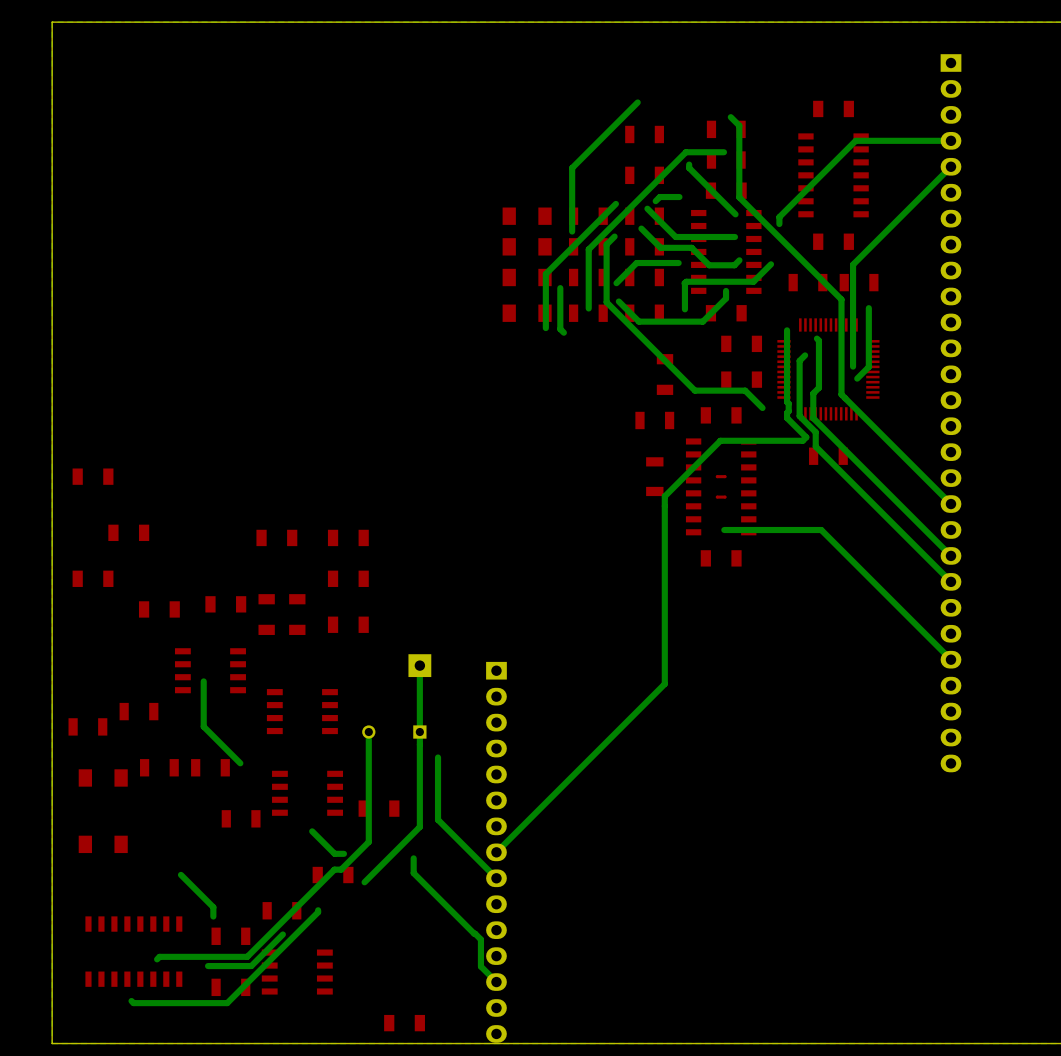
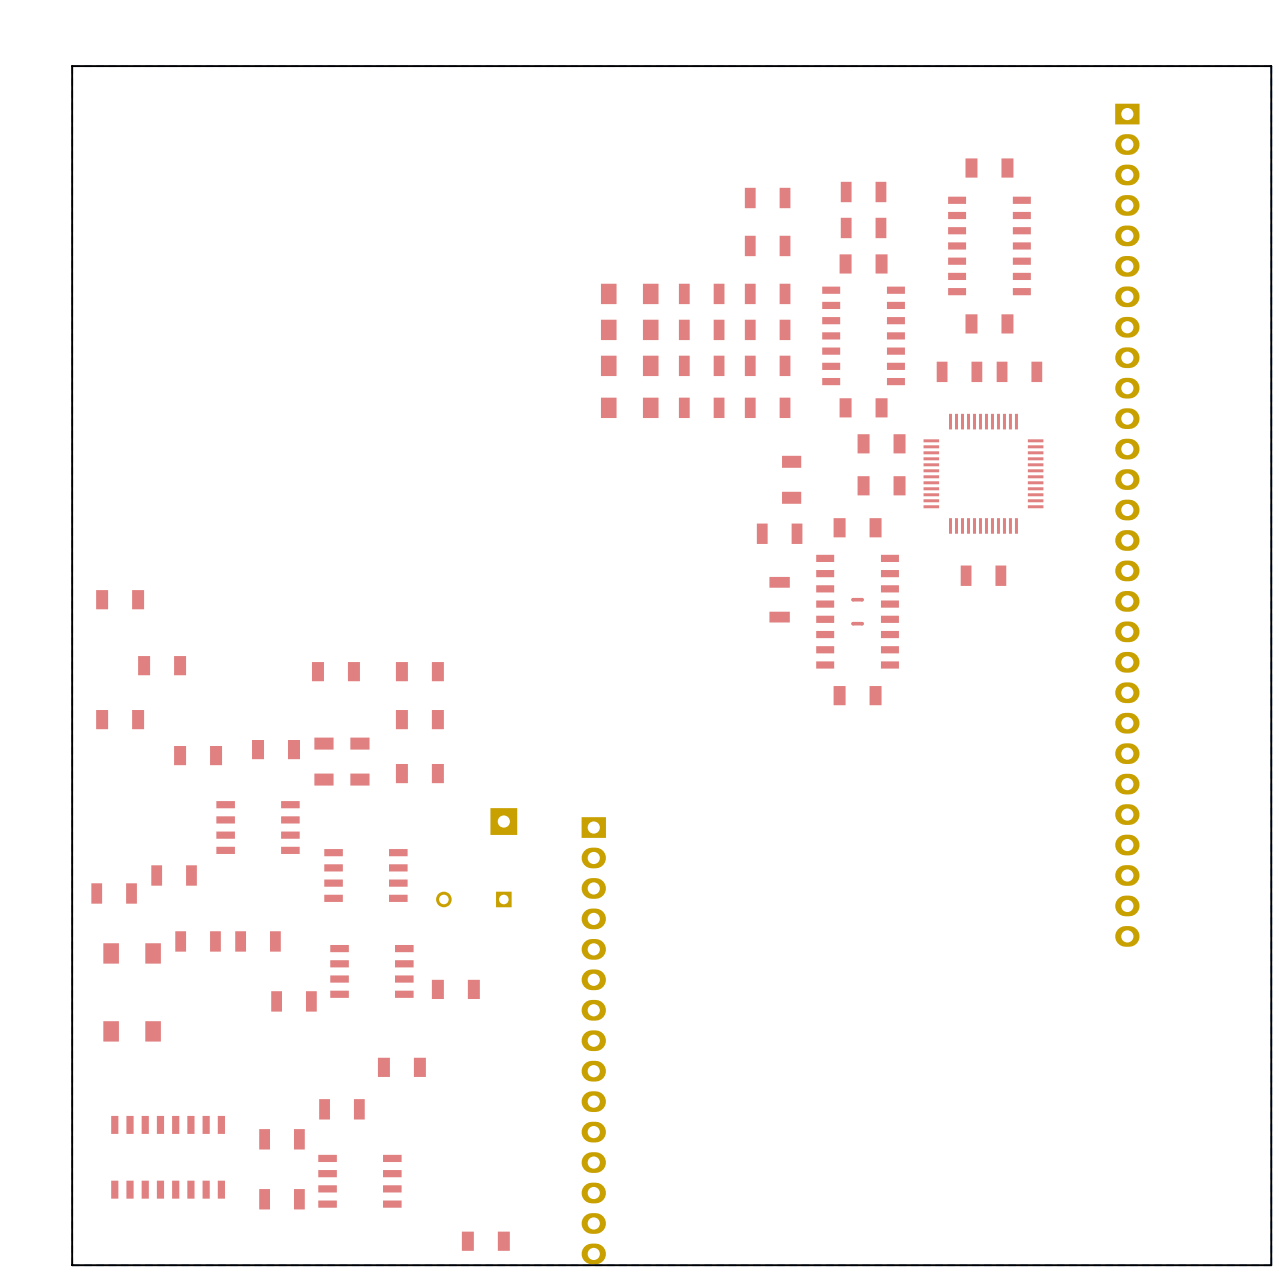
bottom track: (637, 102) (572, 168) (572, 231) -> none
bottom track: (730, 117) (739, 125) (739, 197) (841, 299) (841, 394) (951, 504) -> none
bottom track: (951, 140) (855, 140) (779, 217) (779, 224) -> none
bottom track: (723, 152) (685, 152) (588, 249) (588, 308) -> none
bottom track: (689, 164) (689, 167) (735, 214) -> none
bottom track: (951, 166) (853, 264) (853, 366) -> none
bottom track: (679, 197) (659, 197) (655, 201) -> none
bottom track: (615, 203) (545, 273) (545, 328) -> none
bottom track: (647, 208) (675, 237) (734, 237) -> none
bottom track: (641, 228) (660, 247) (691, 247) (709, 265) (734, 265) (739, 260) -> none
bottom track: (614, 236) (606, 244) (606, 302) (694, 390) (745, 390) (762, 408) -> none
bottom track: (678, 263) (636, 263) (616, 283) -> none
bottom track: (771, 264) (753, 281) (684, 283) -> none
bottom track: (684, 283) (684, 309) -> none
bottom track: (560, 288) (560, 329) (563, 332) -> none
bottom track: (726, 290) (726, 298) (702, 321) (638, 321) (618, 301) -> none
bottom track: (868, 308) (868, 367) (857, 378) -> none
bottom track: (787, 330) (787, 402) (788, 403) (787, 418) (806, 437) (802, 440) (720, 440) (664, 496) (664, 684) (496, 852) -> none
bottom track: (816, 338) (818, 340) (818, 387) (813, 393) (813, 418) (951, 555) -> none
bottom track: (805, 355) (799, 360) (799, 416) (815, 432) (815, 446) (951, 581) -> none
bottom track: (724, 530) (821, 530) (951, 659) -> none
bottom track: (419, 665) (419, 826) (364, 882) -> none
bottom track: (203, 681) (203, 726) (240, 763) -> none
bottom track: (368, 732) (368, 842) (341, 869) (334, 869) (247, 956) (159, 956) (157, 959) -> none
bottom track: (438, 757) (438, 819) (496, 878) -> none
bottom track: (312, 831) (334, 853) (343, 853) -> none
bottom track: (413, 858) (413, 873) (480, 939) (480, 966) (496, 982) -> none
bottom track: (180, 874) (213, 907) (213, 916) -> none
bottom track: (318, 910) (227, 1003) (133, 1003) (131, 1001) -> none
bottom track: (282, 934) (251, 966) (208, 966) -> none

